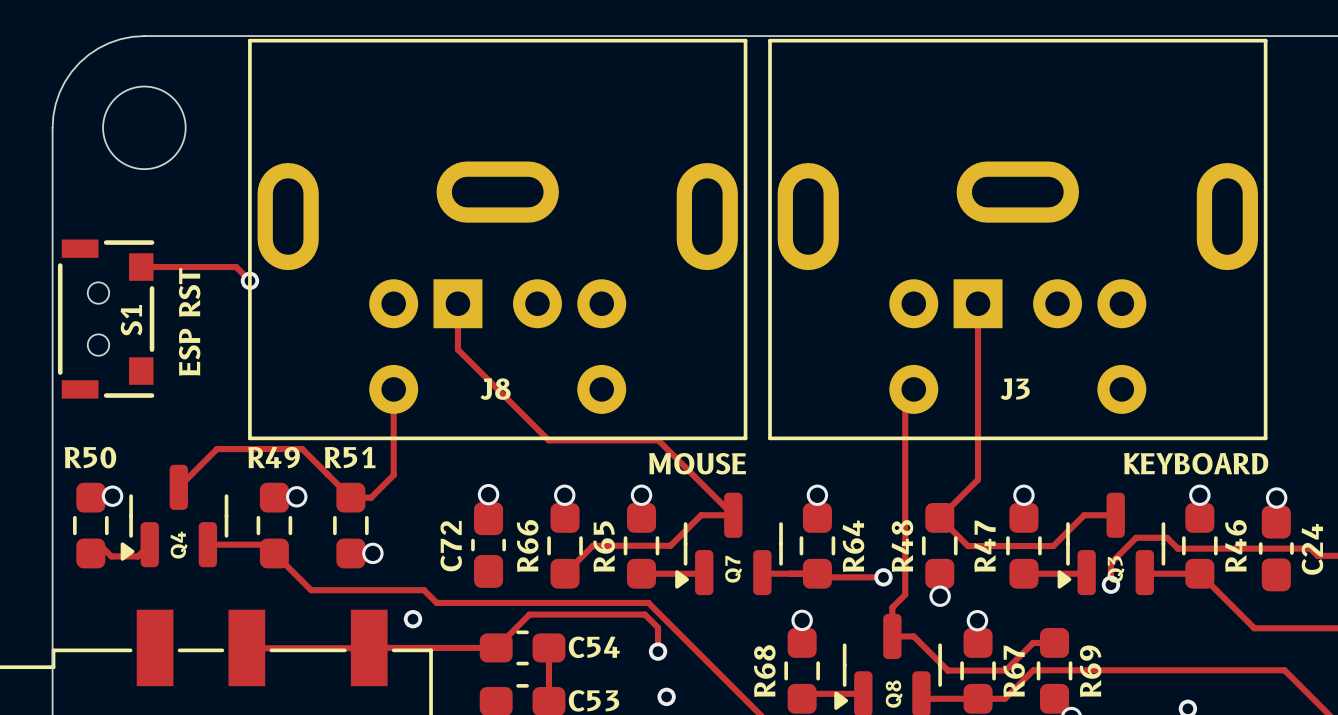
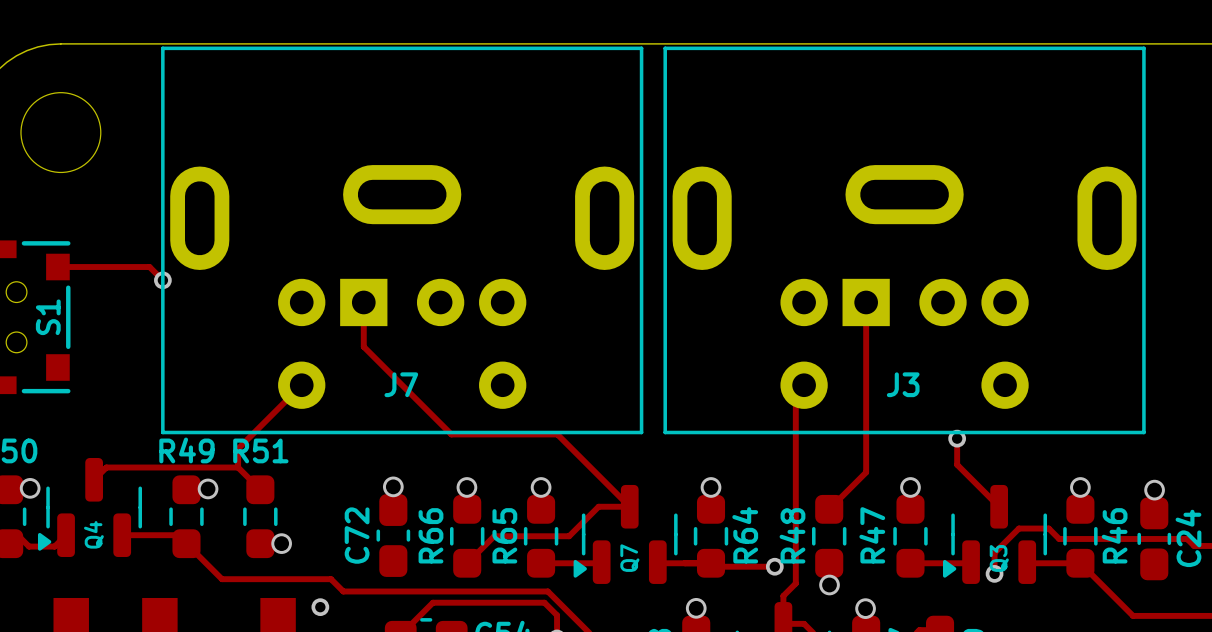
text: ESP RST (189, 321) -> none
track: (393, 389) (393, 475) (371, 497) (350, 497) -> none
J8 name: J8 (495, 389) -> J7 (401, 384)
via: none -> (957, 438)
text: MOUSE (697, 463) -> none
text: KEYBOARD (1196, 463) -> none
track: (327, 474) (302, 449) (217, 449) (178, 487) -> (301, 385) (238, 448) (238, 467) (106, 467) (94, 479)
track: (1115, 515) (1084, 515) (1053, 546) (967, 546) (939, 517) -> (999, 506) (957, 464) (957, 438)

